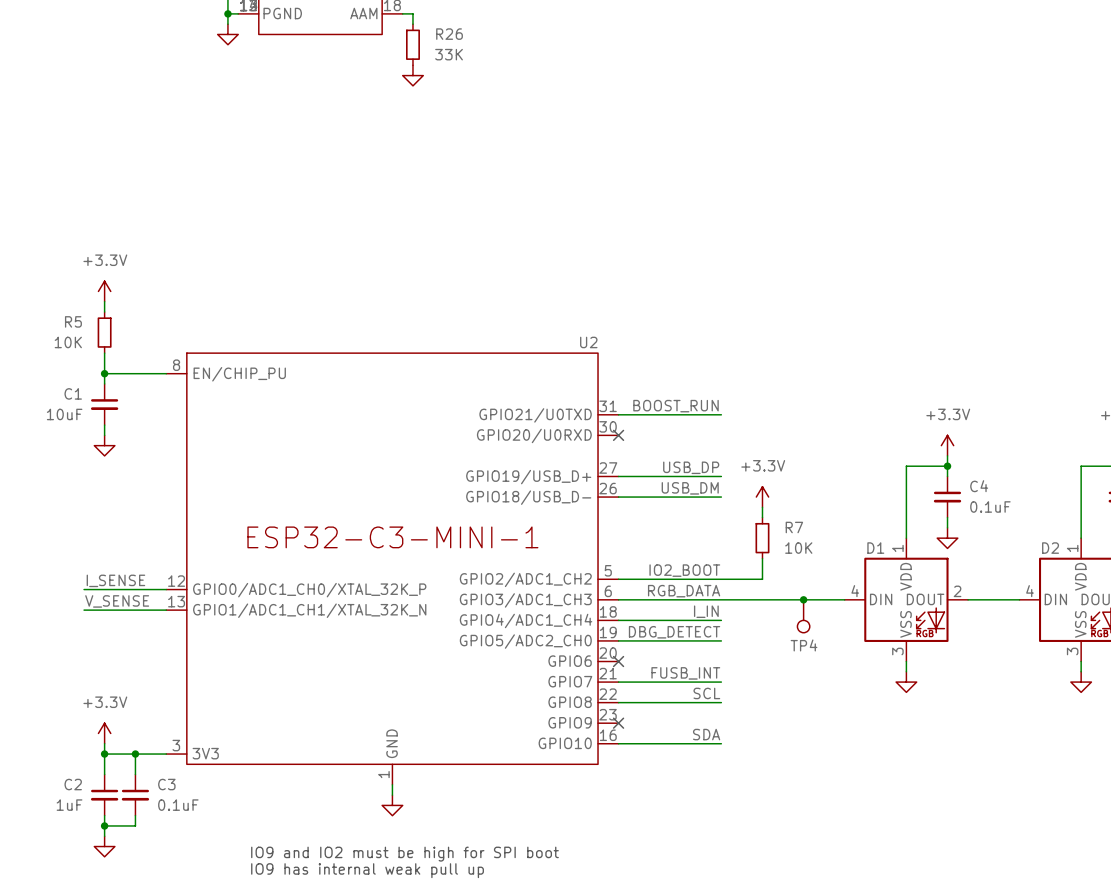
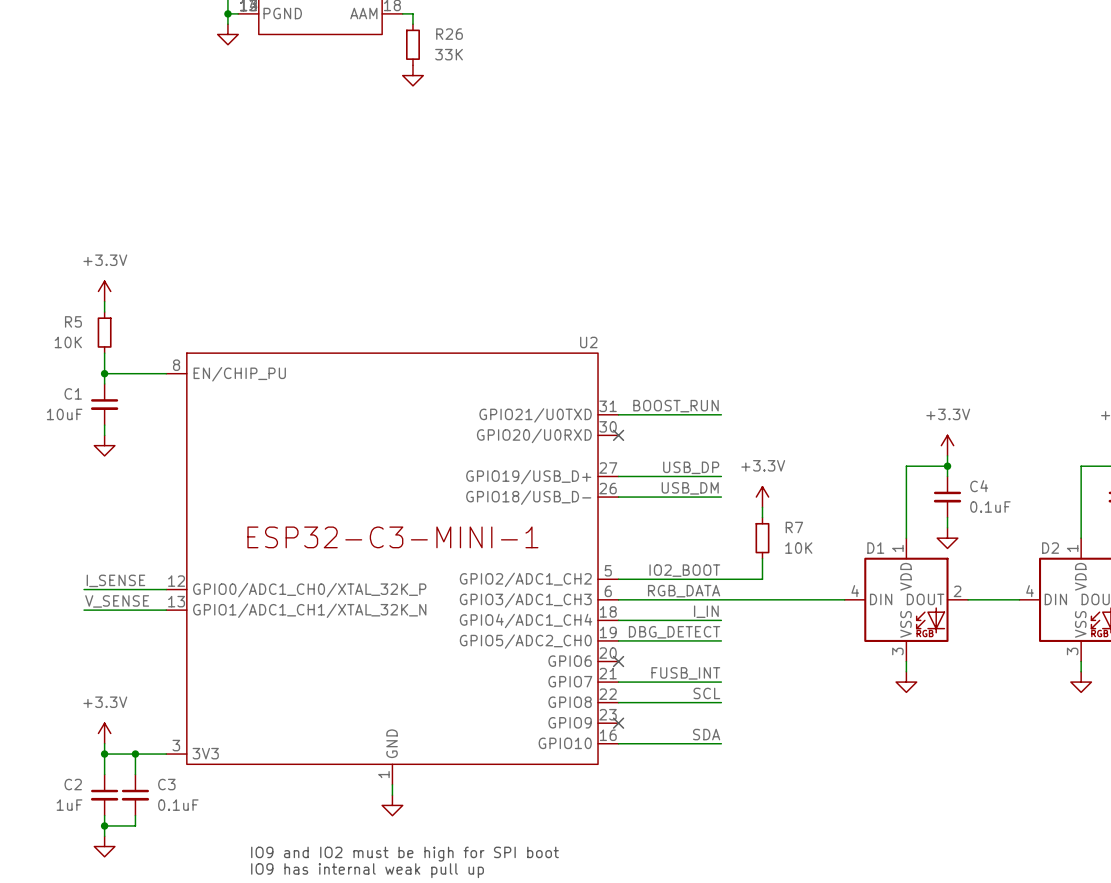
junction: (803, 599) -> none
TP4: (803, 616) -> none

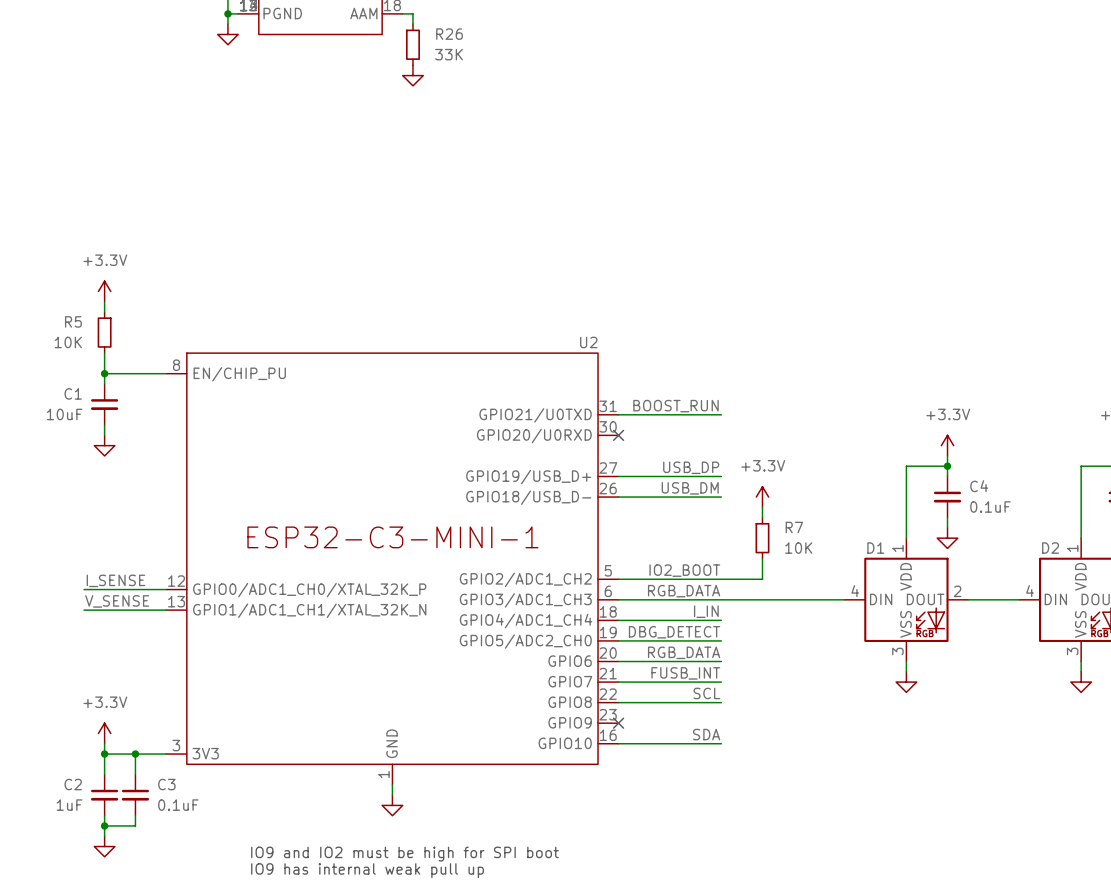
label: none -> RGB_DATA (684, 652)
wire: none -> (618, 661) (721, 661)
no-connect mark: (618, 661) -> none

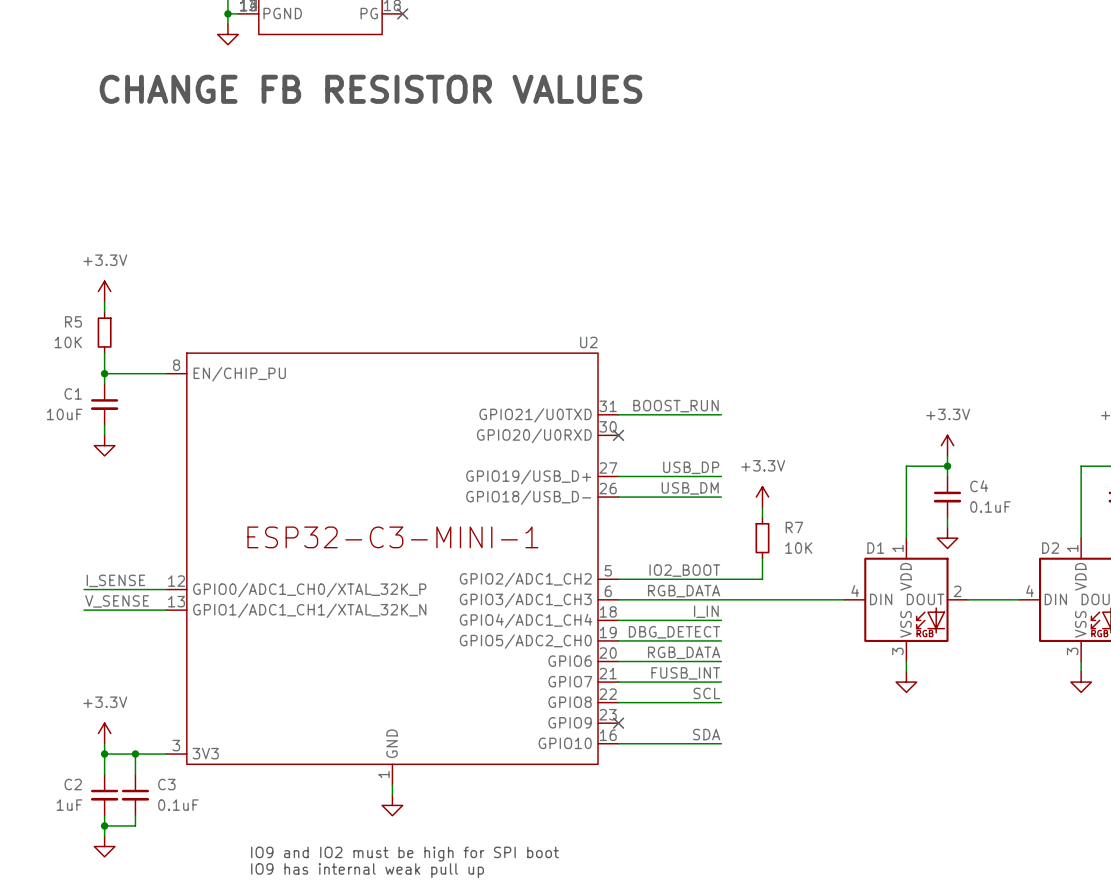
part pin name: AAM (363, 13) -> PG (369, 13)
wire: (402, 13) (412, 13) (412, 24) -> none
no-connect mark: none -> (402, 13)
R26: 33K (412, 44) -> none
power symbol: (412, 75) -> none
text: none -> CHANGE FB RESISTOR VALUES (370, 89)

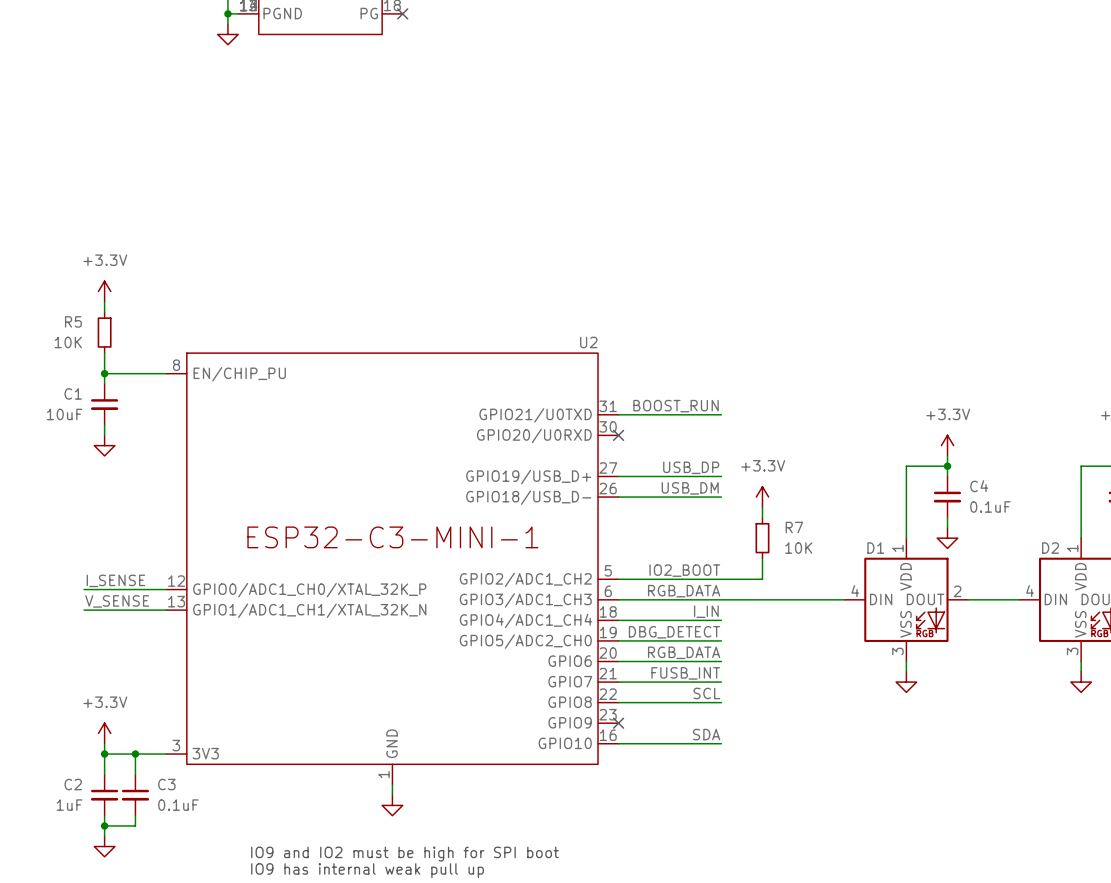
text: CHANGE FB RESISTOR VALUES (370, 89) -> none

